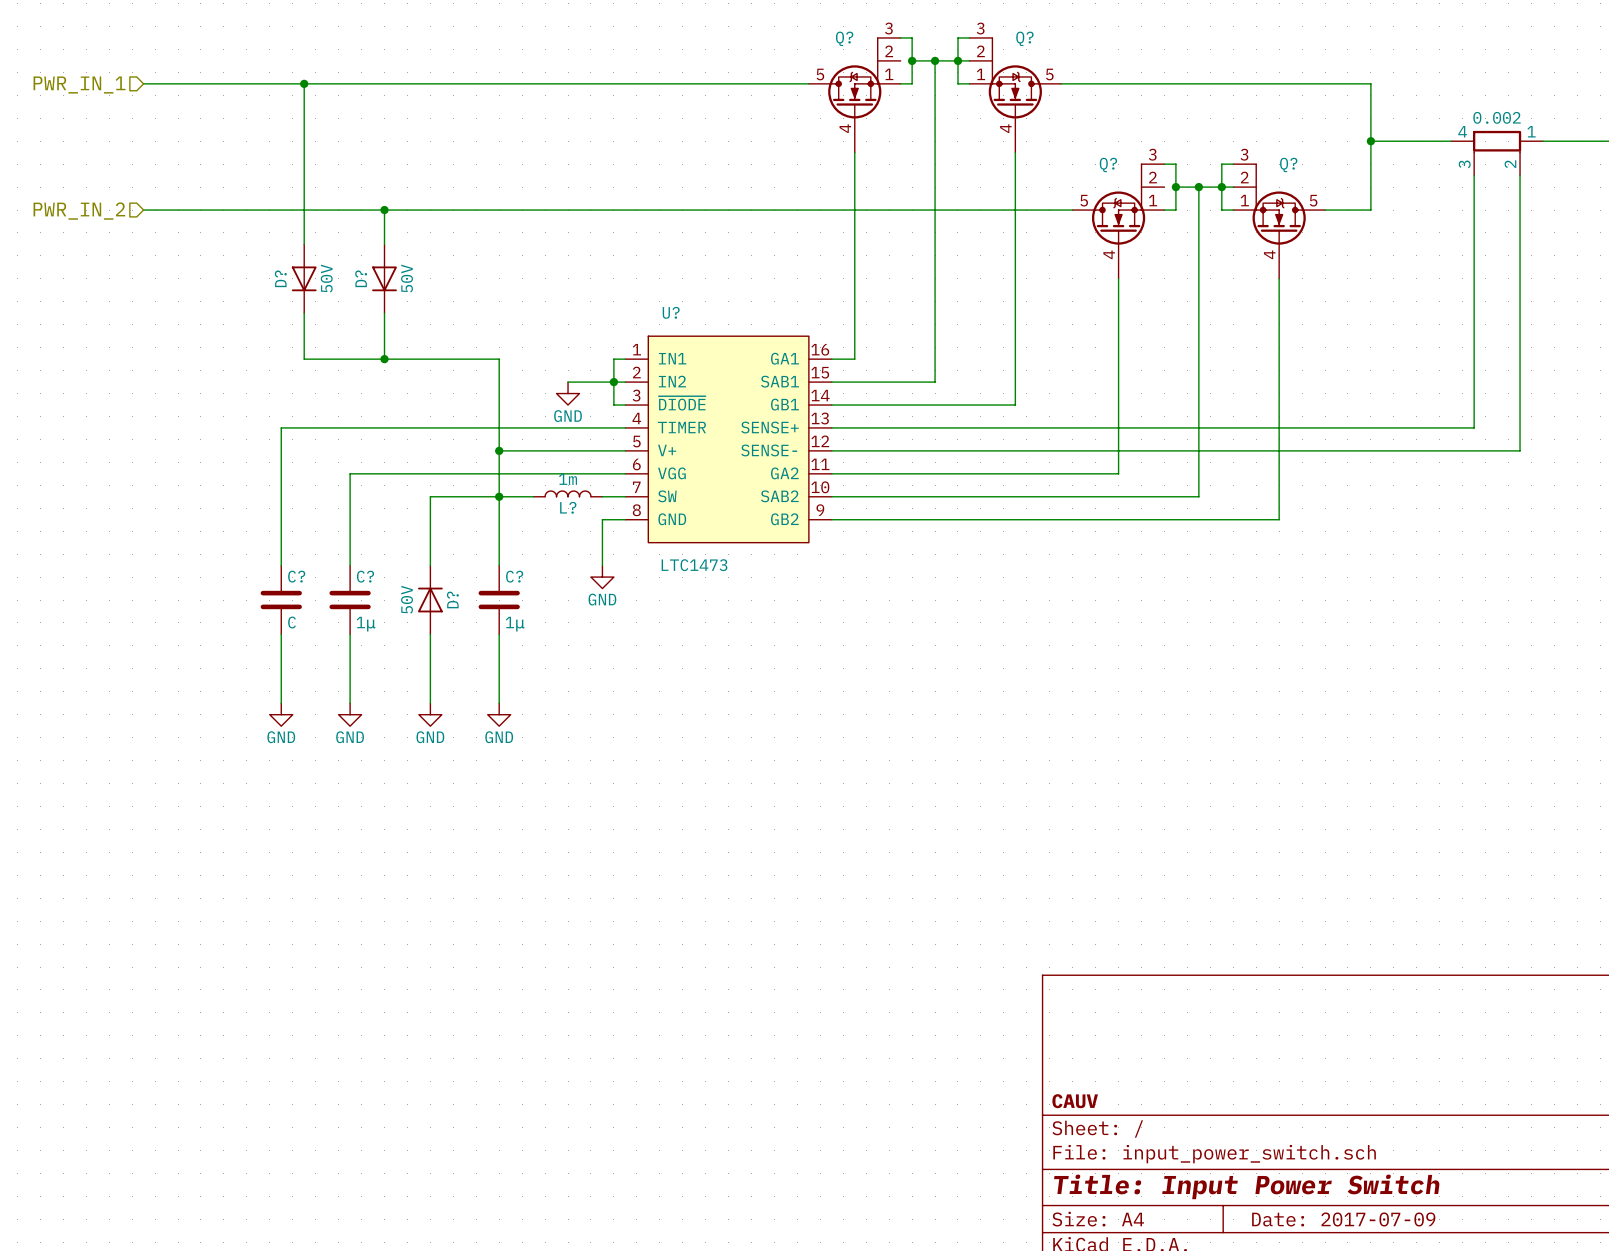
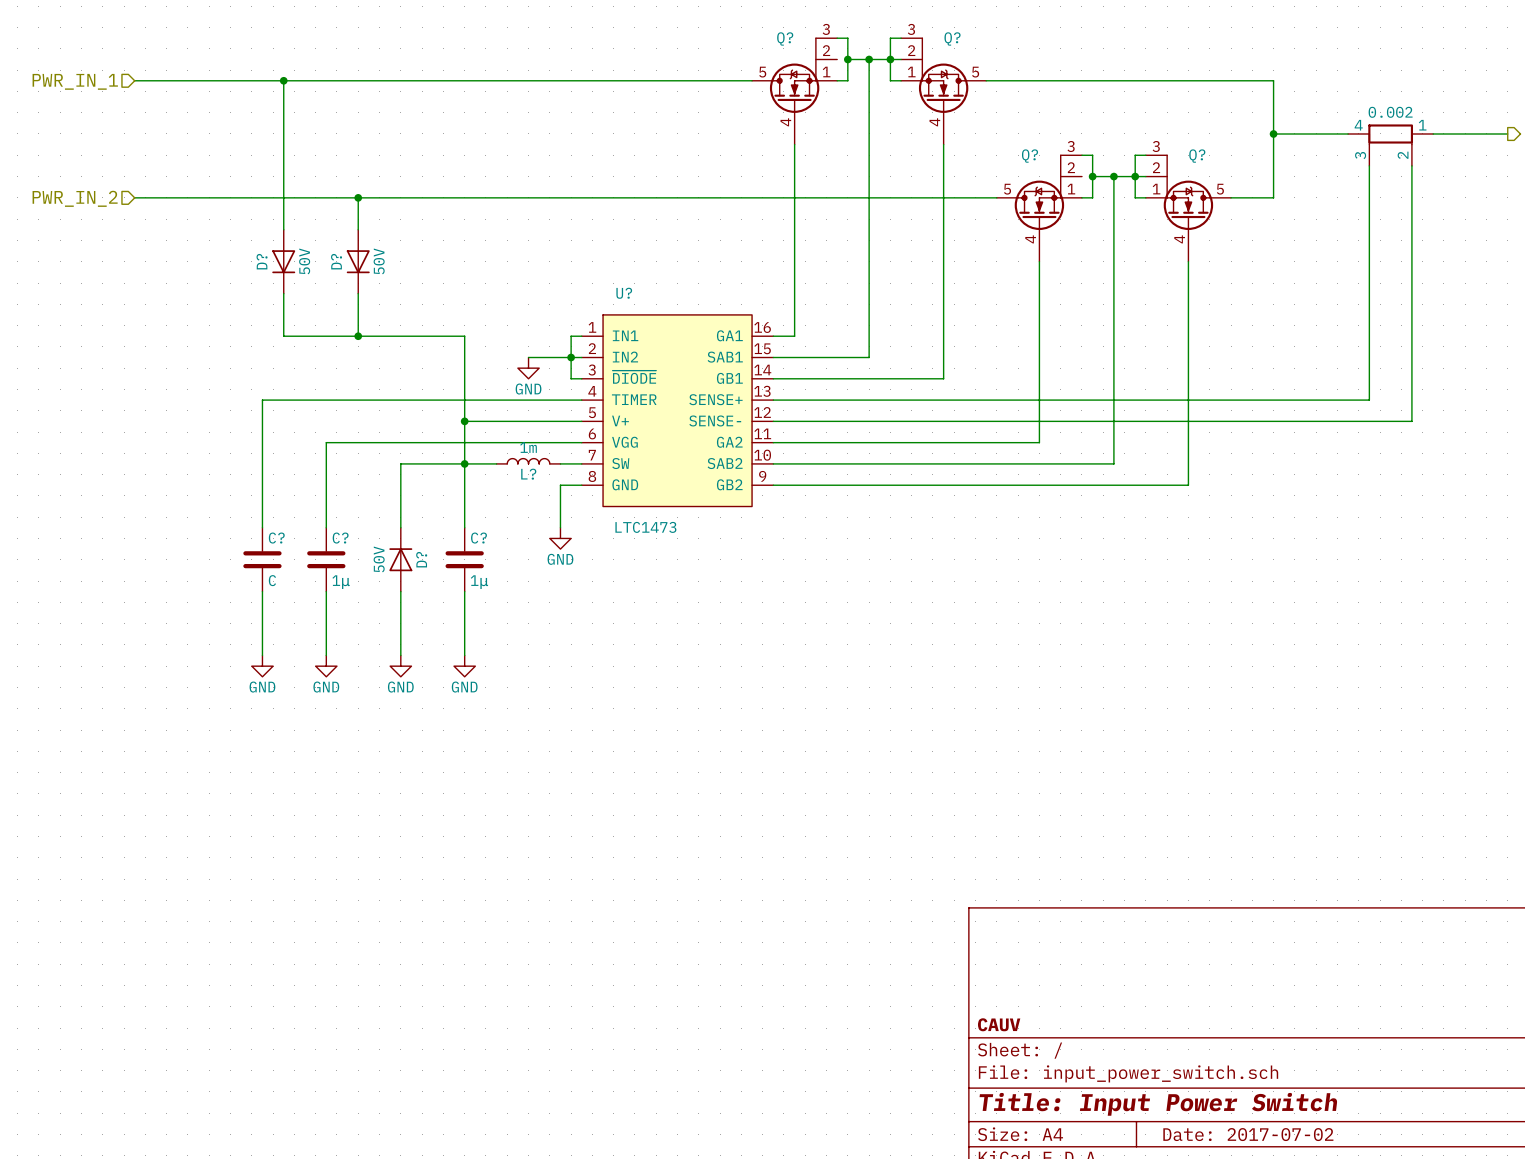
title block: Date: 2017-07-09 (1343, 1219) -> Date: 2017-07-02 (1248, 1134)

